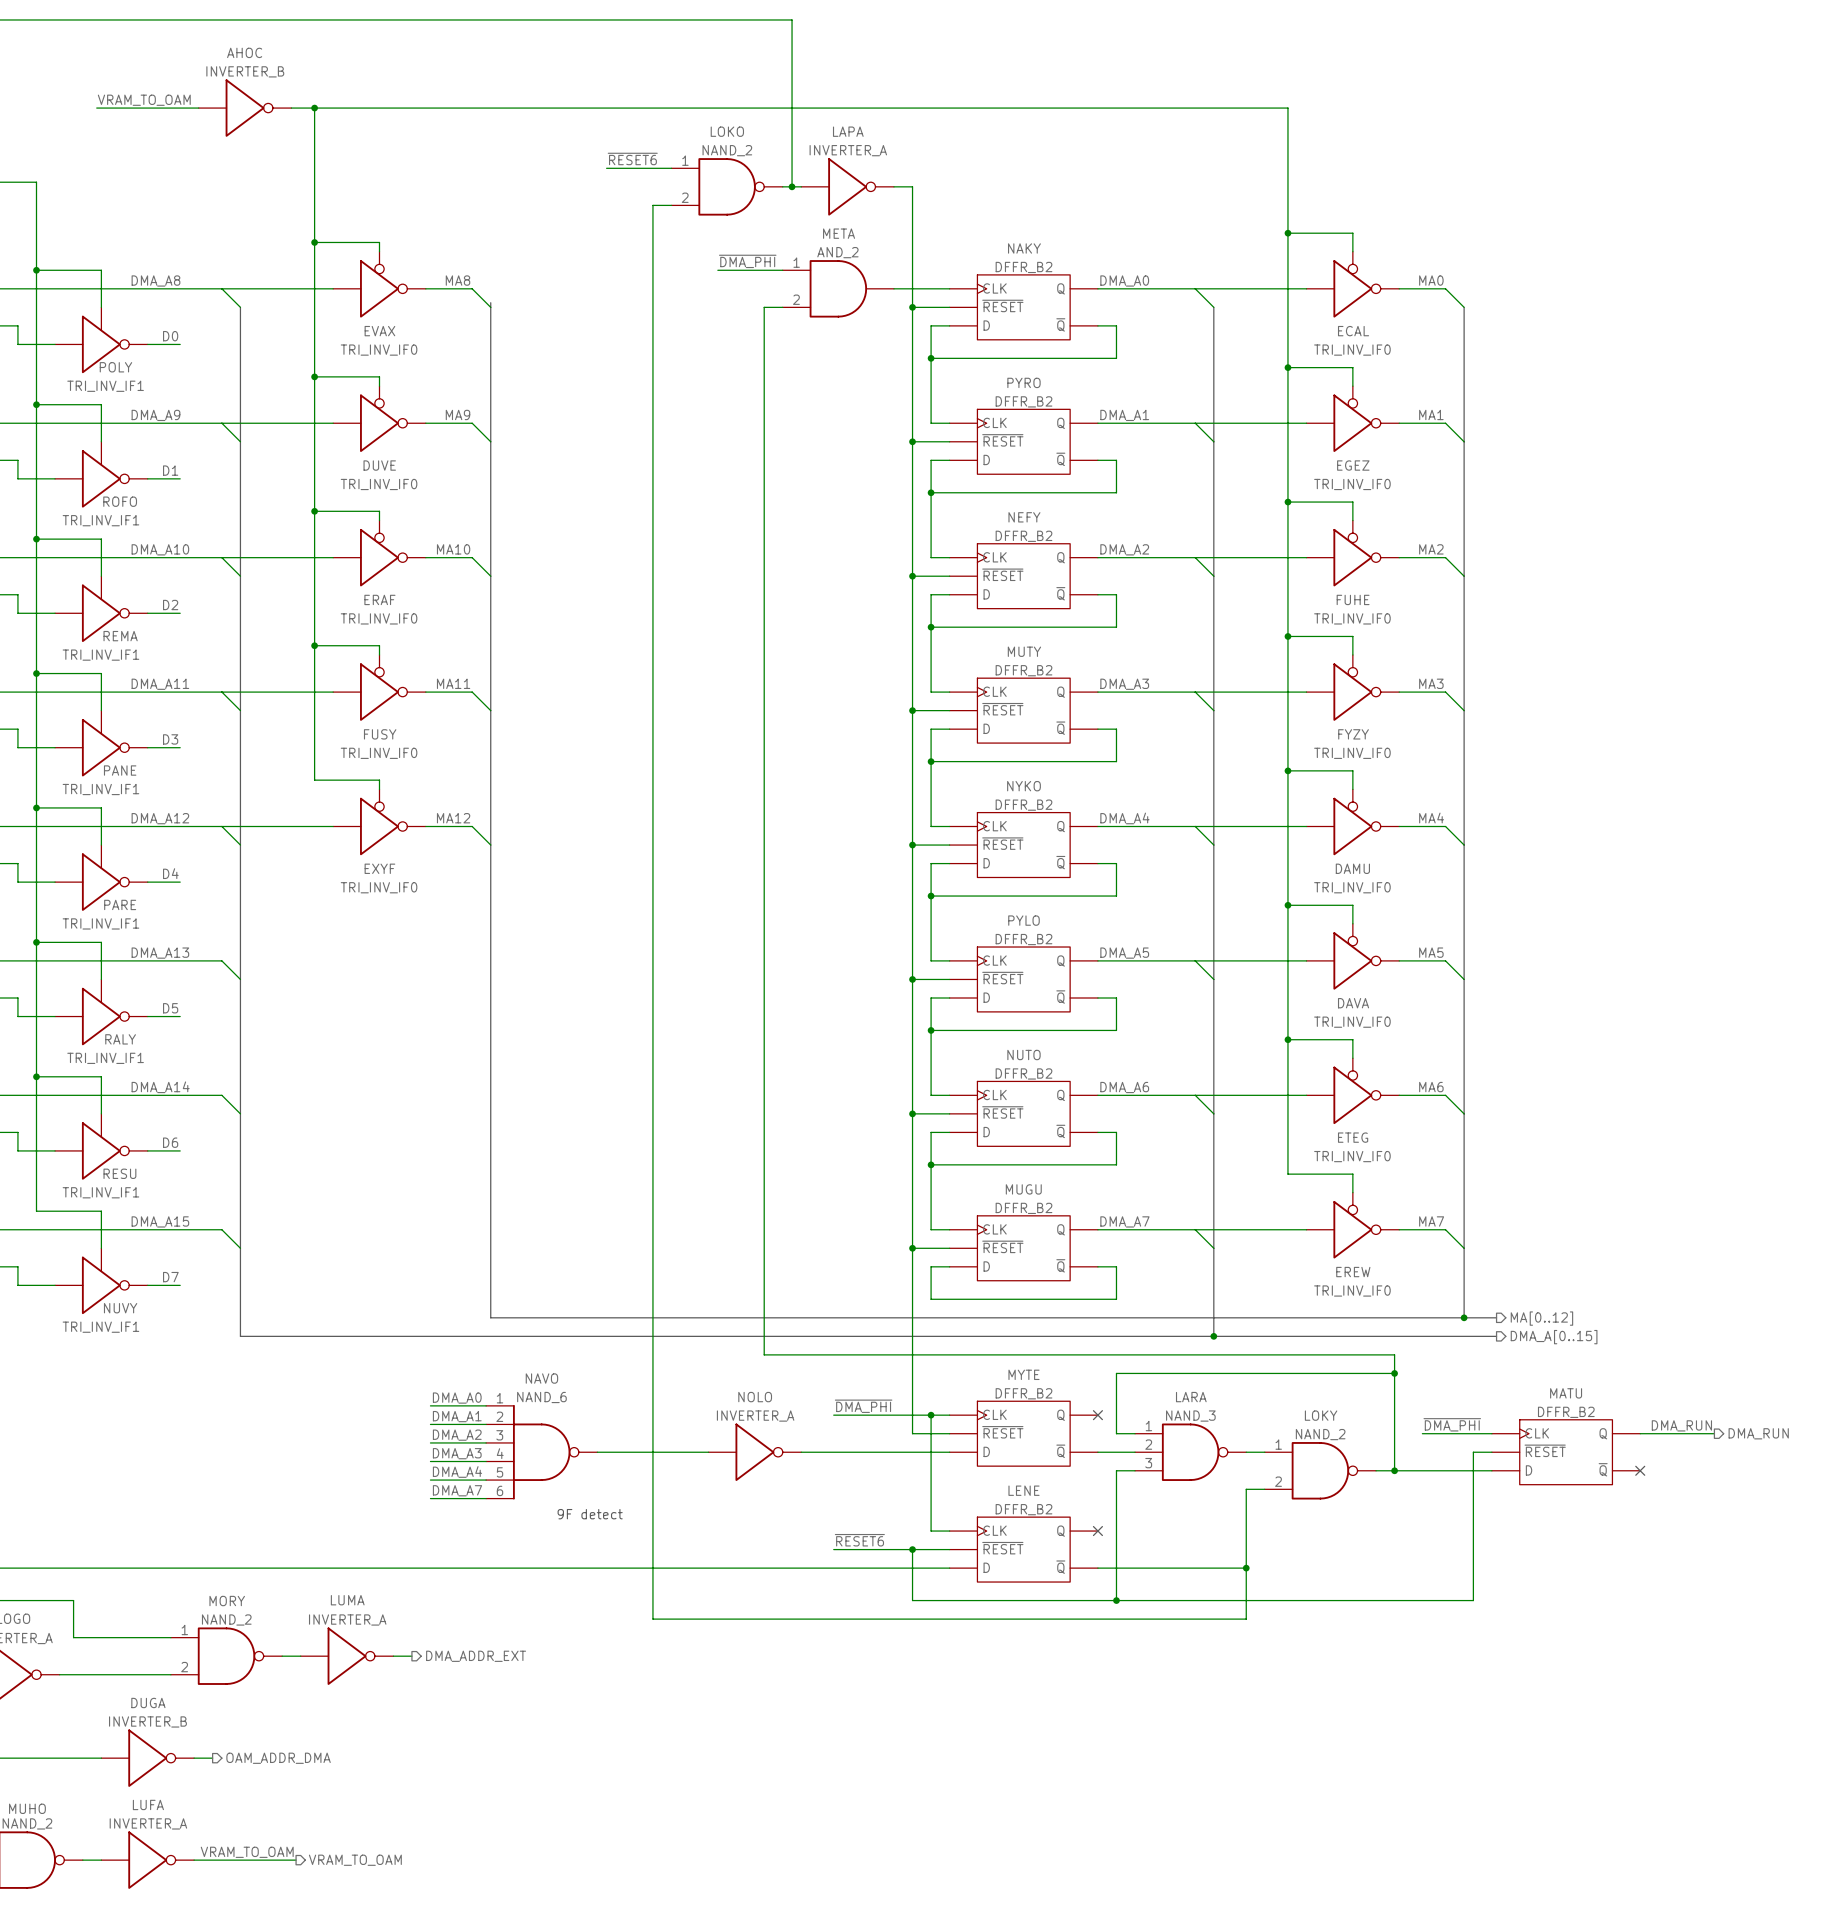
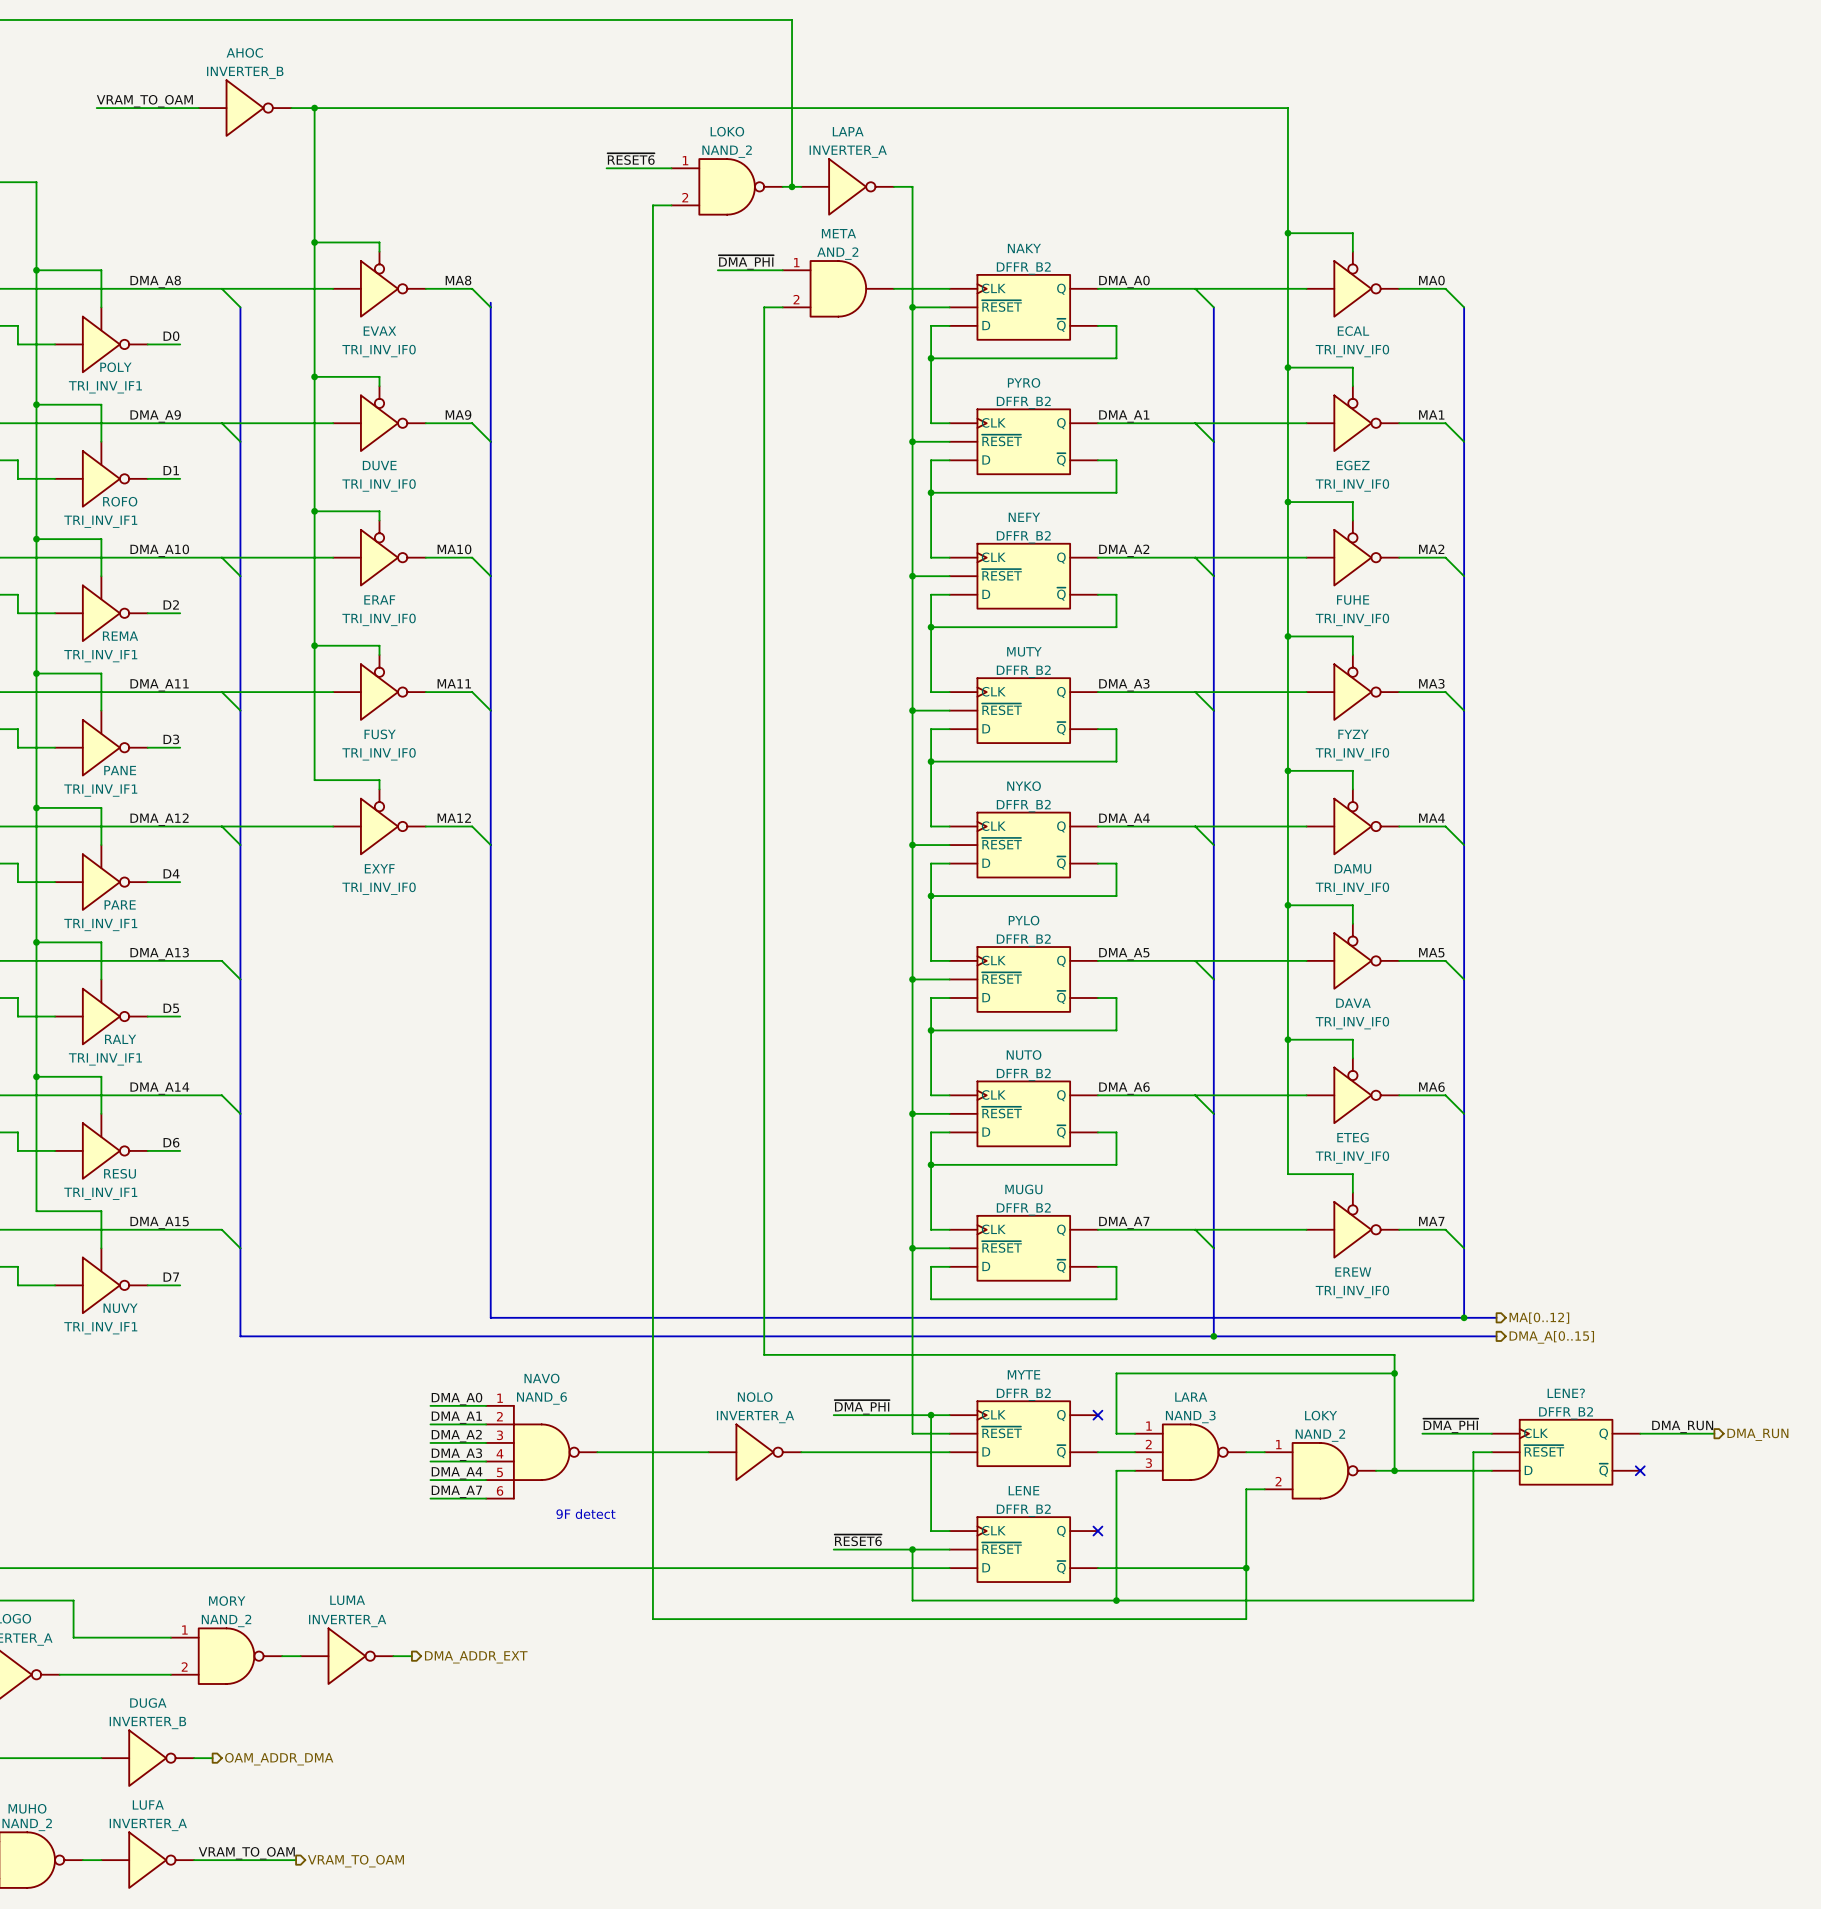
MATU name: MATU (1566, 1393) -> LENE? (1566, 1393)

